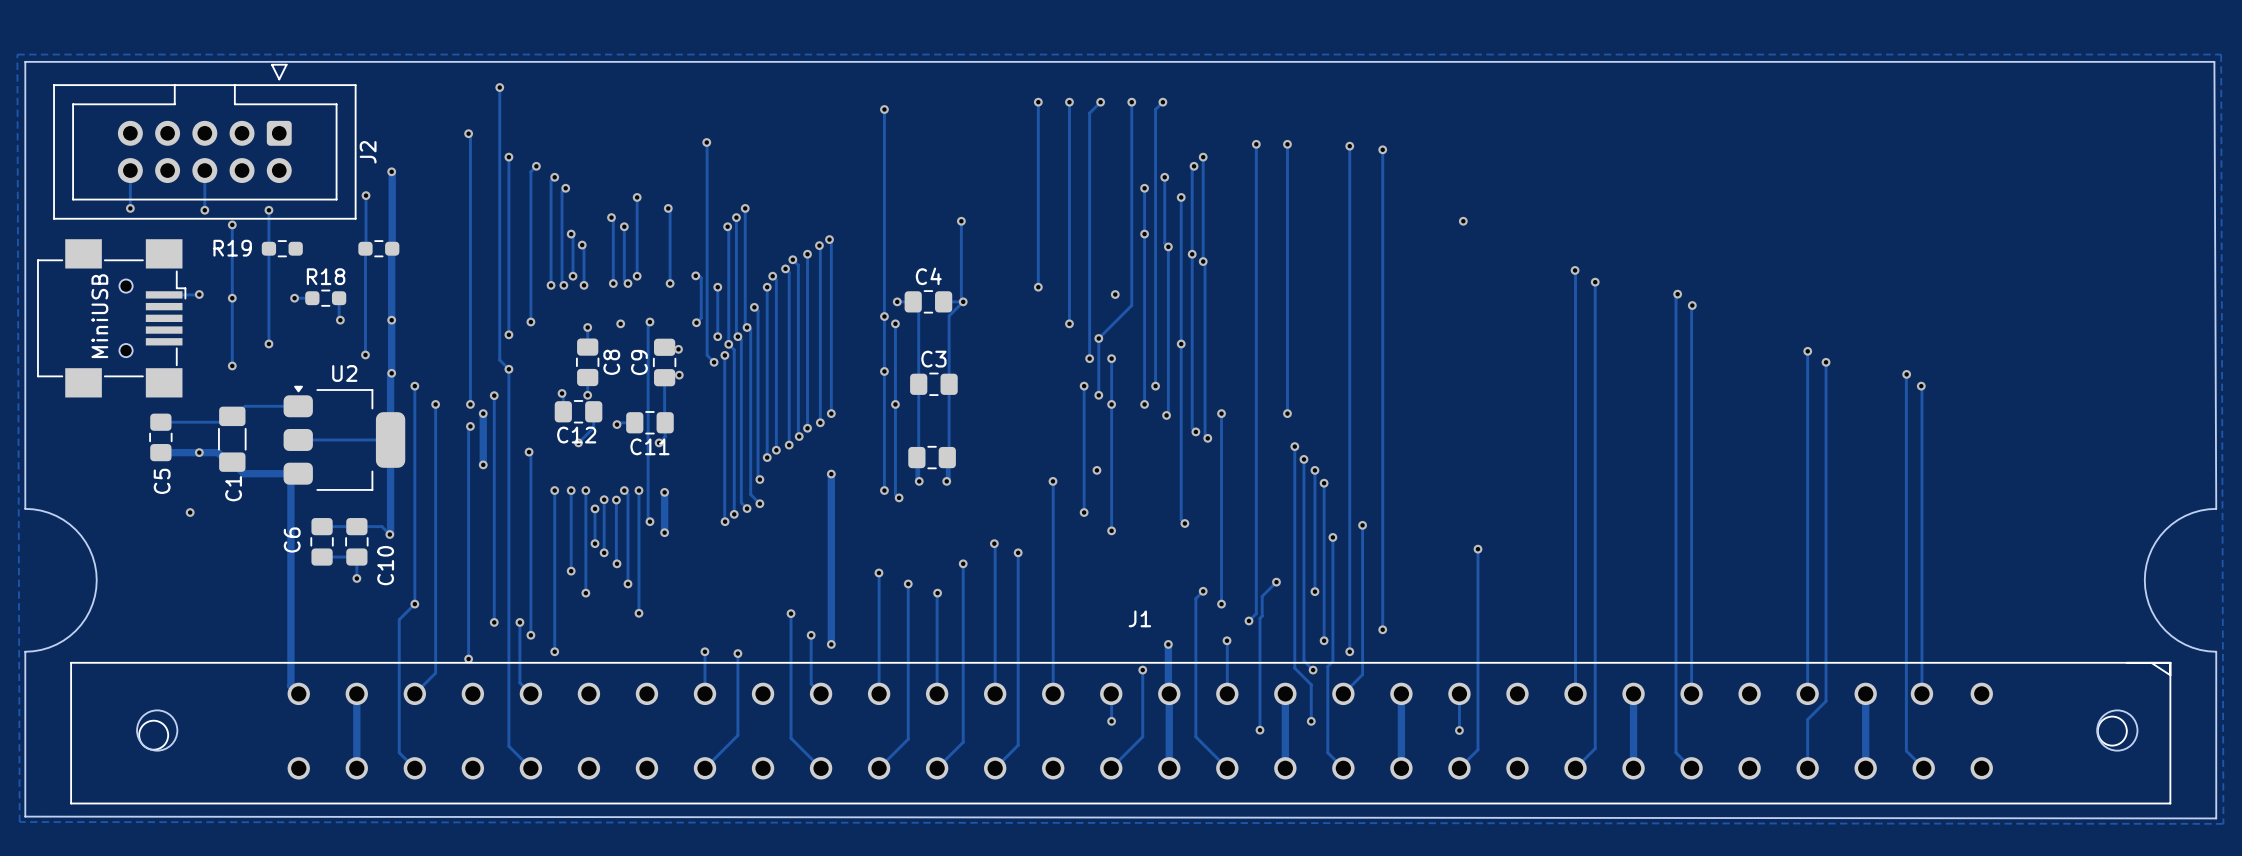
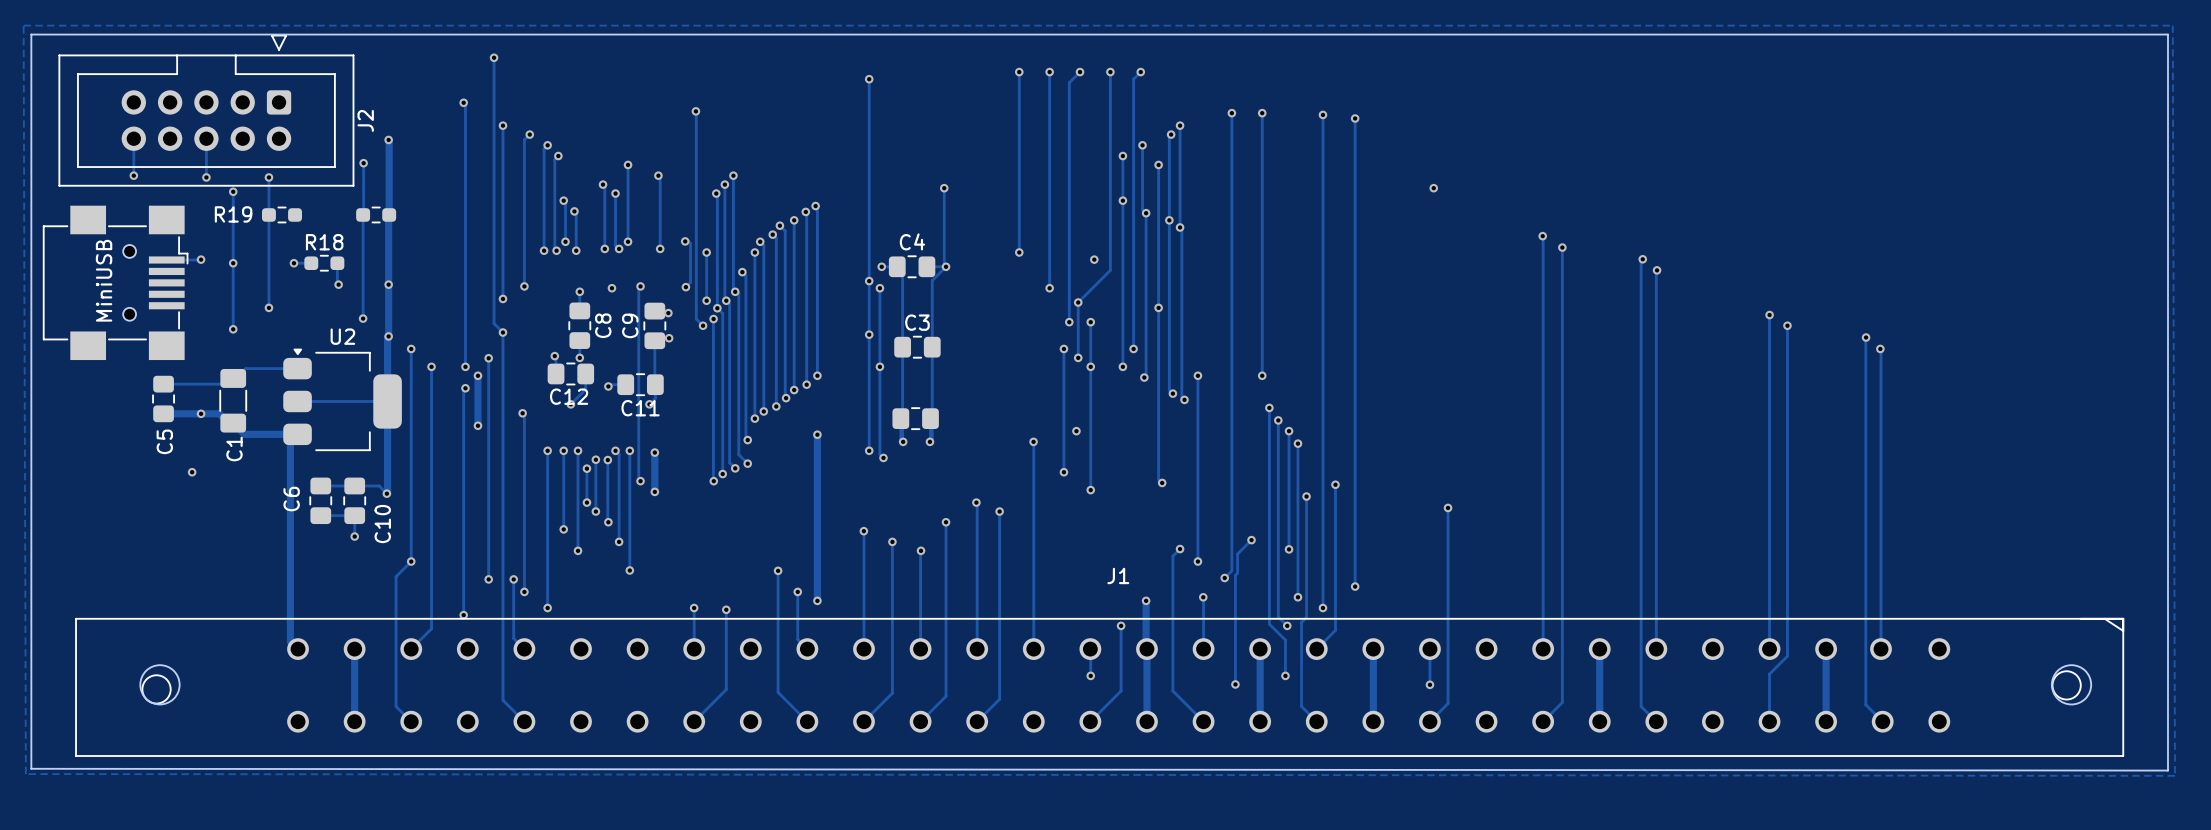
board edge: (25, 63) (25, 61) (2214, 61) (2216, 508) (2200, 510) (2185, 515) (2165, 529) (2155, 542) (2148, 556) (2144, 580) (2148, 603) (2155, 618) (2165, 630) (2185, 644) (2200, 649) (2216, 651) -> (31, 34) (2167, 34) (2167, 608)
board edge: (25, 508) (48, 512) (63, 519) (75, 529) (85, 542) (92, 556) (96, 580) (92, 603) (85, 618) (75, 630) (63, 640) (48, 647) (25, 651) -> (31, 468) (31, 608)

